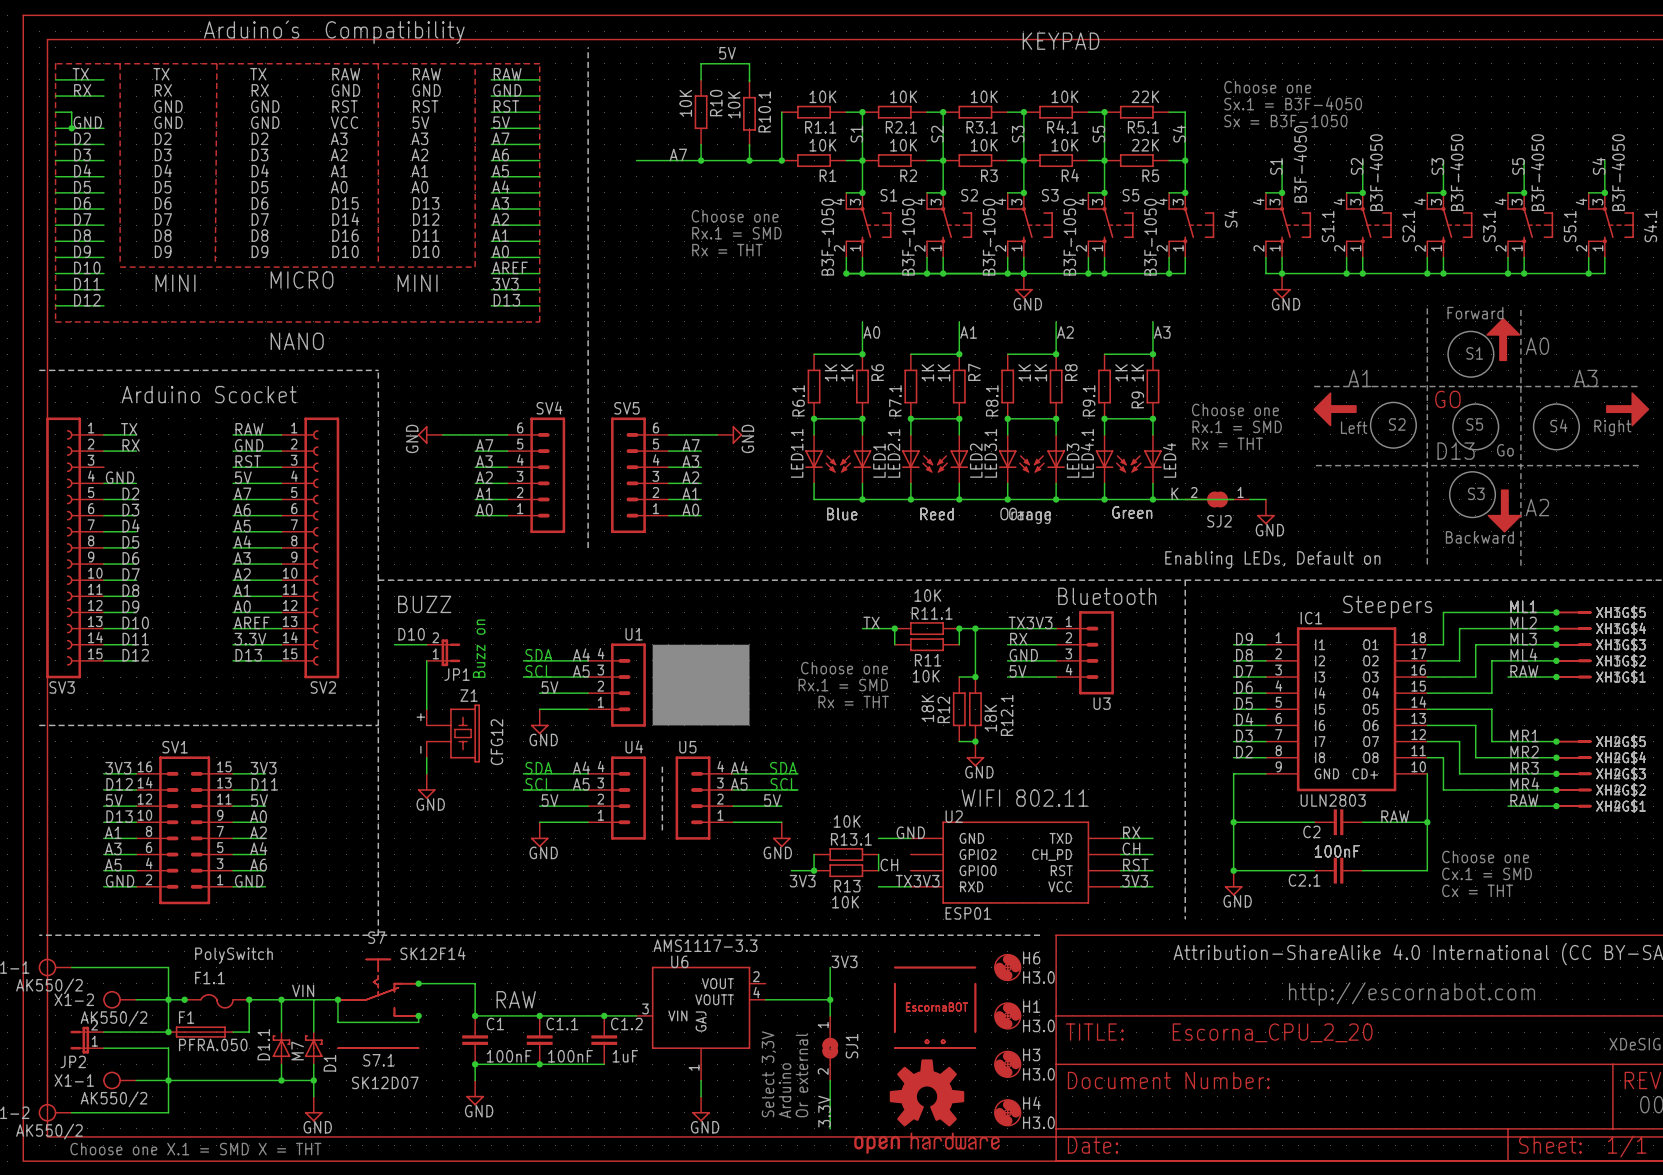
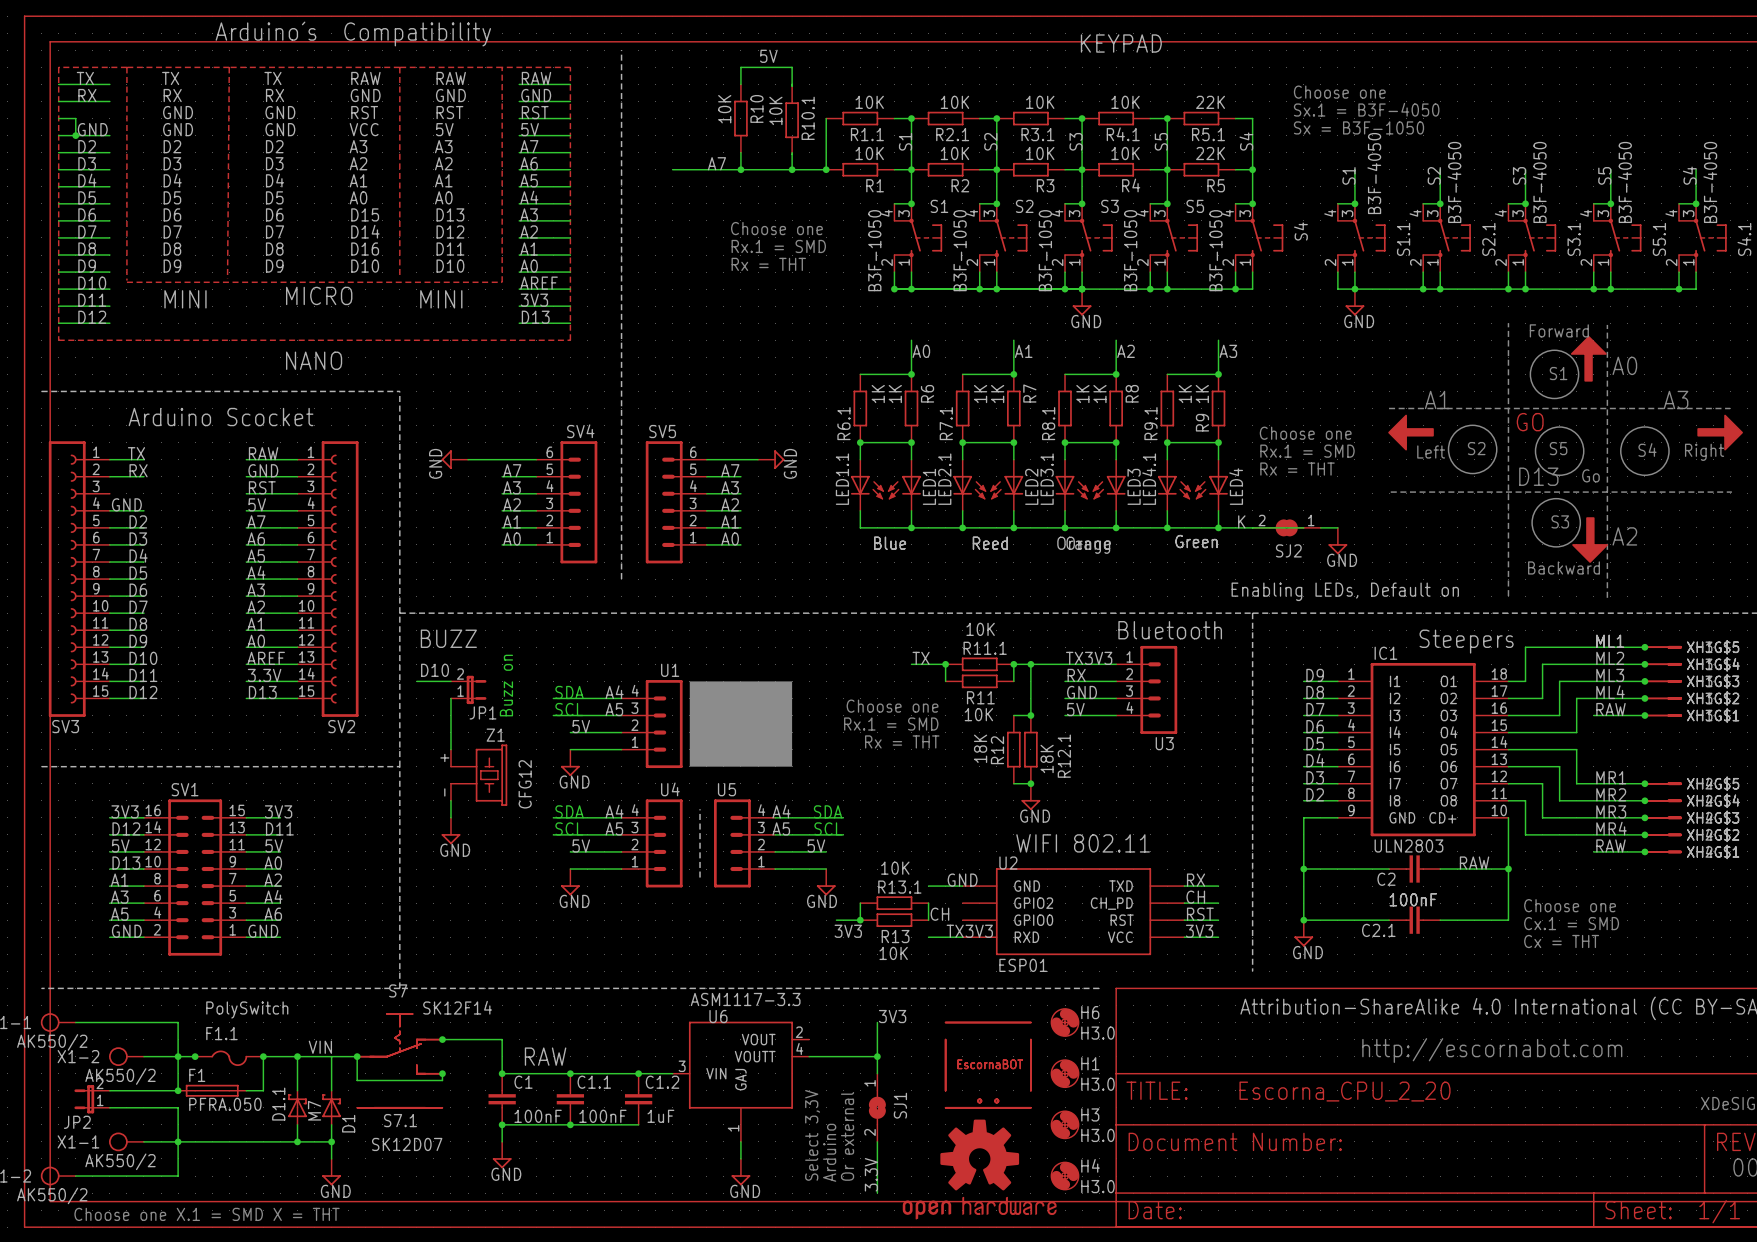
U6 value: AMS1117-3.3 (705, 945) -> ASM1117-3.3 (745, 999)

